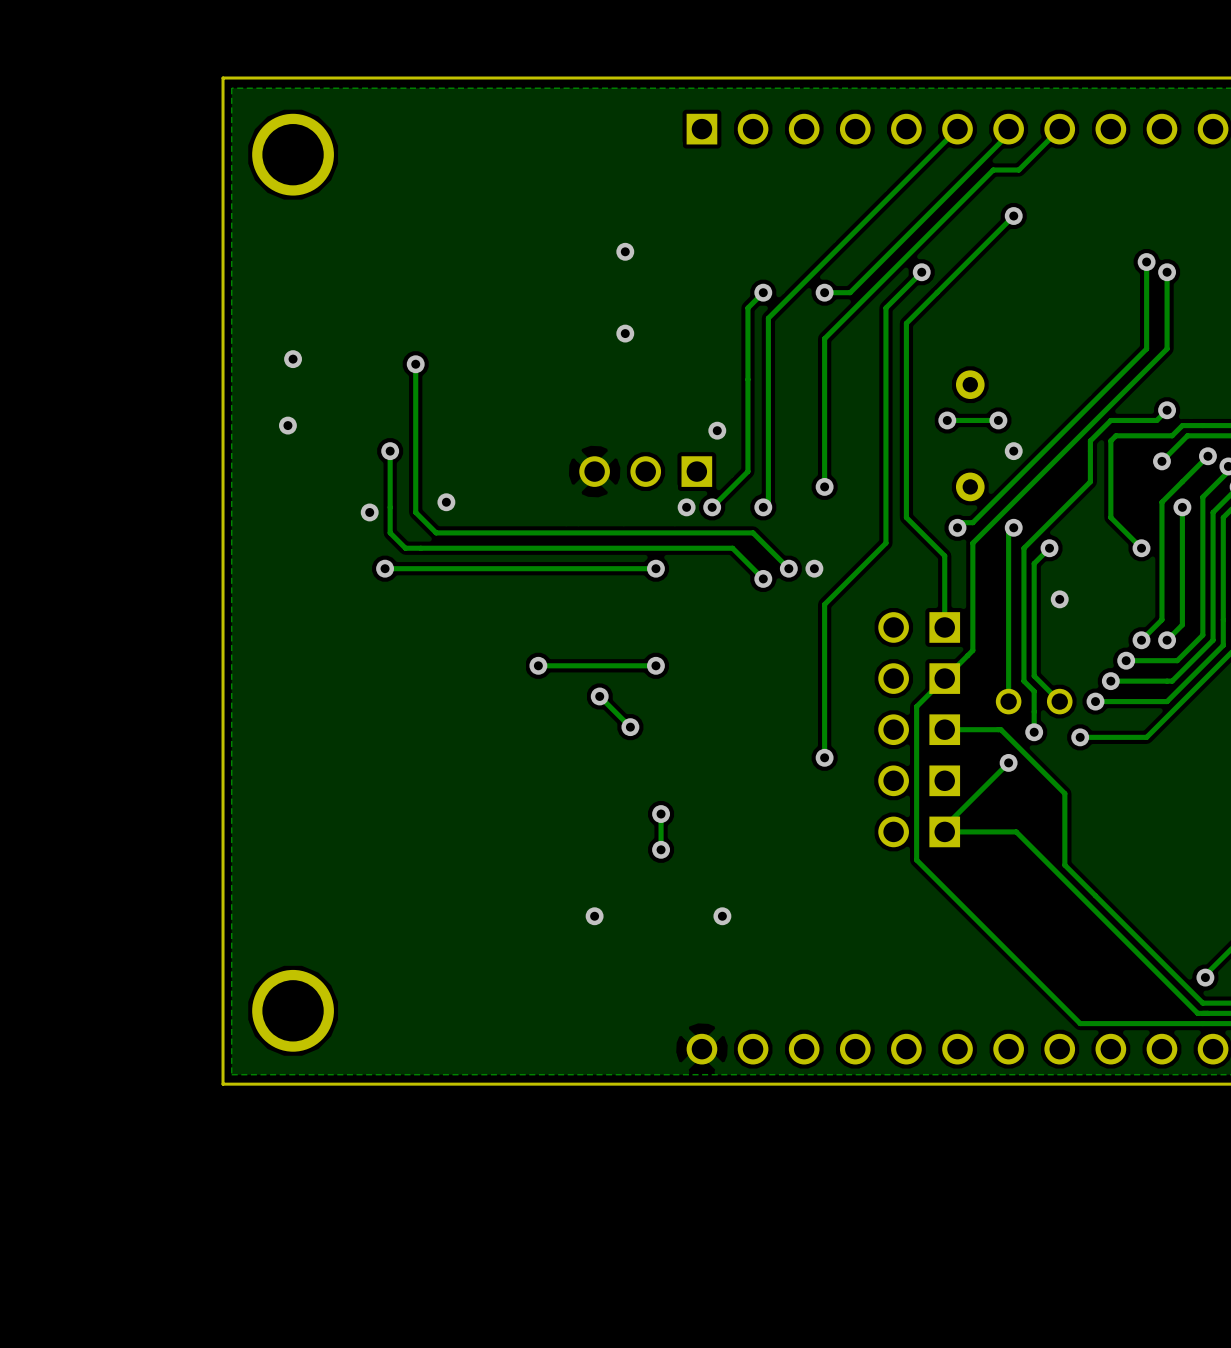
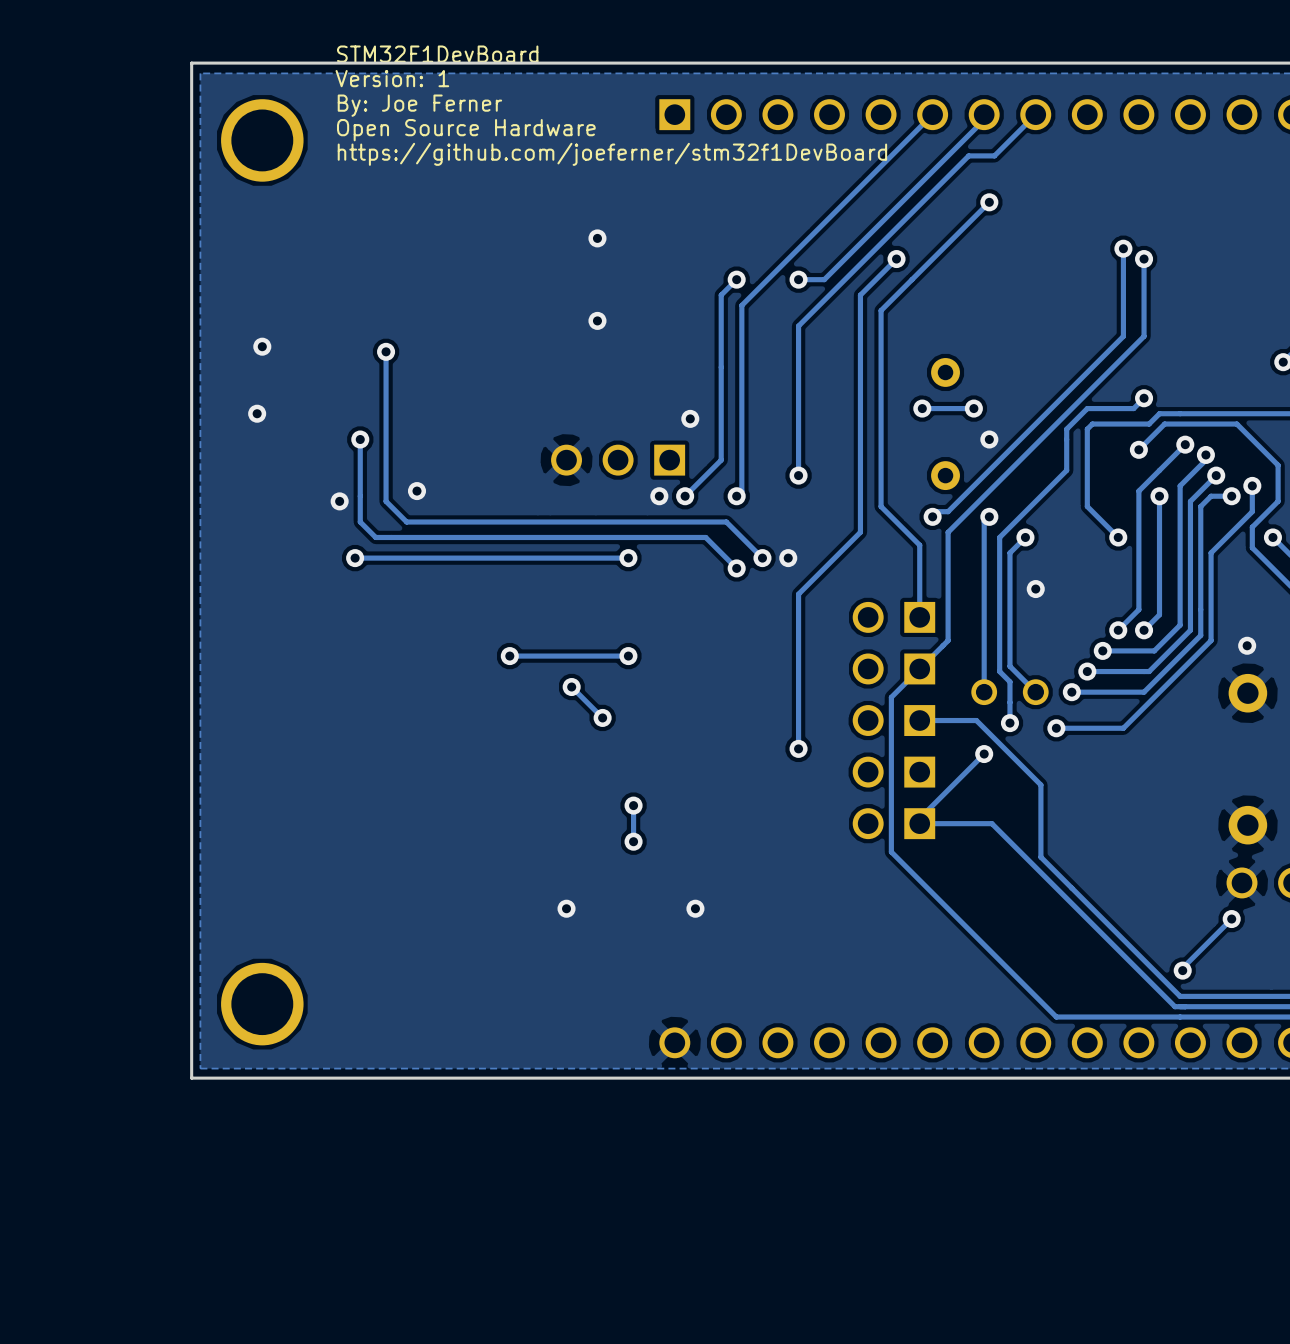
text: none -> STM32F1DevBoard (437, 54)
text: none -> Version: 1 (392, 78)
text: none -> By: Joe Ferner (419, 105)
text: none -> Open Source Hardware (466, 130)
text: none -> https://github.com/joeferner/stm32f1DevBoard (612, 154)

